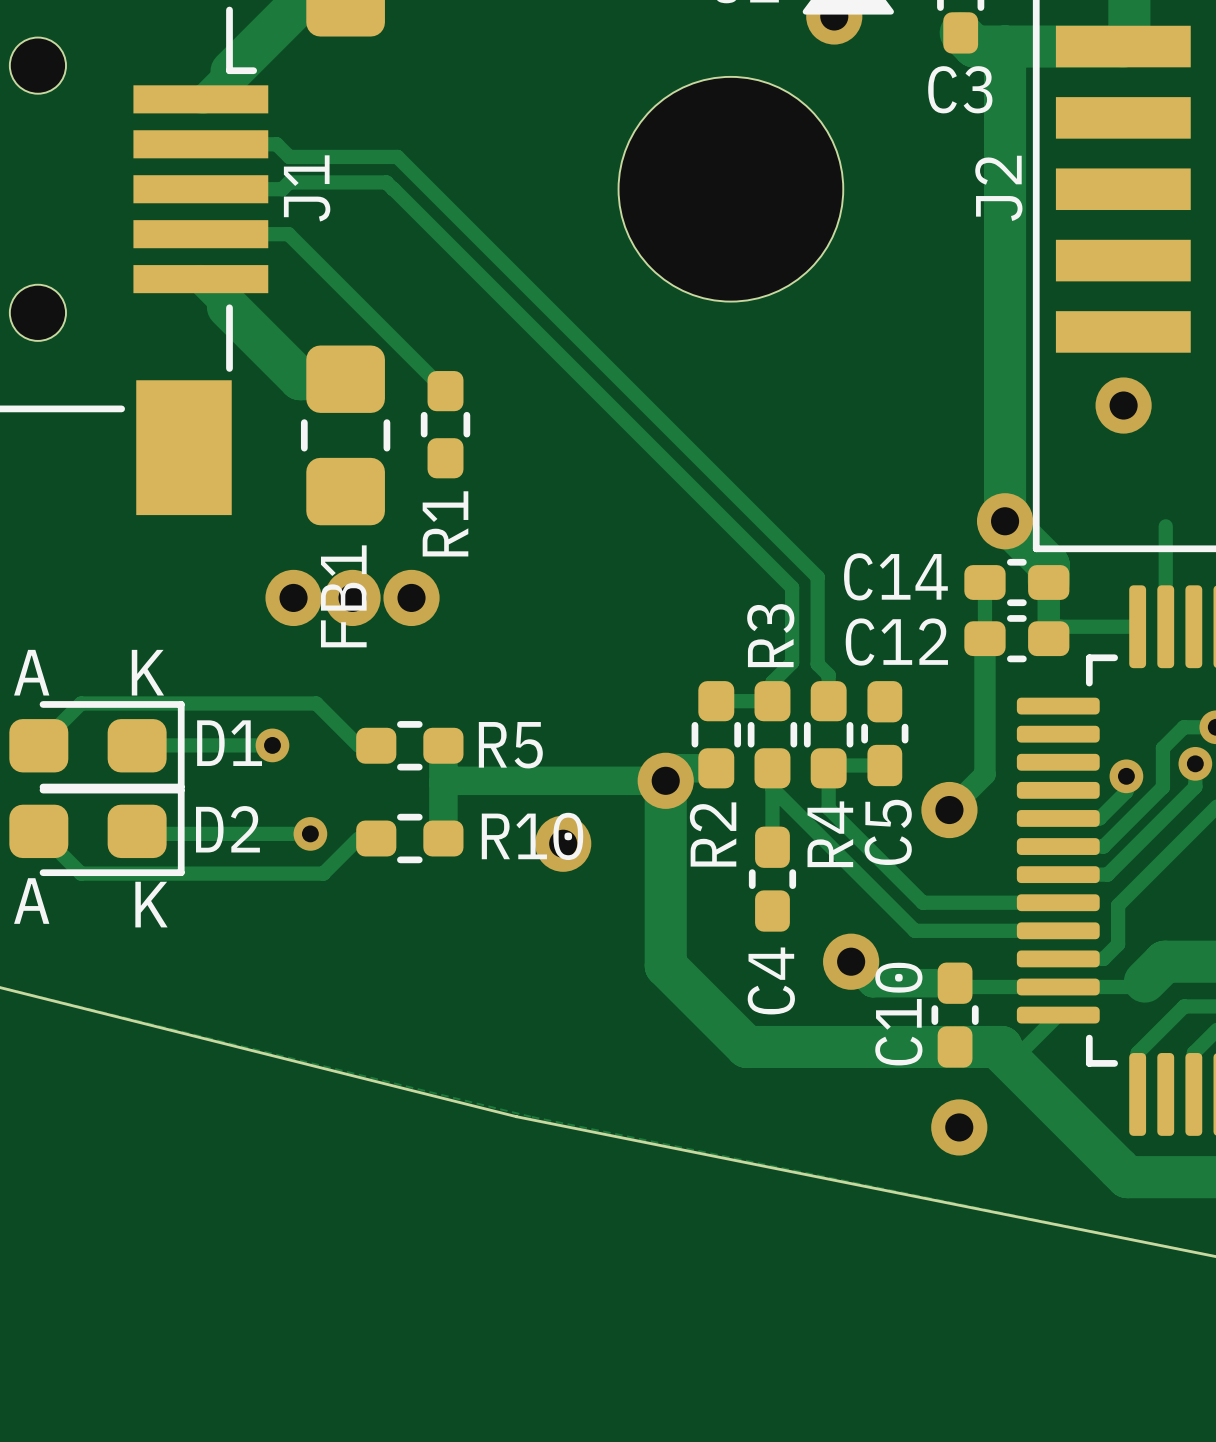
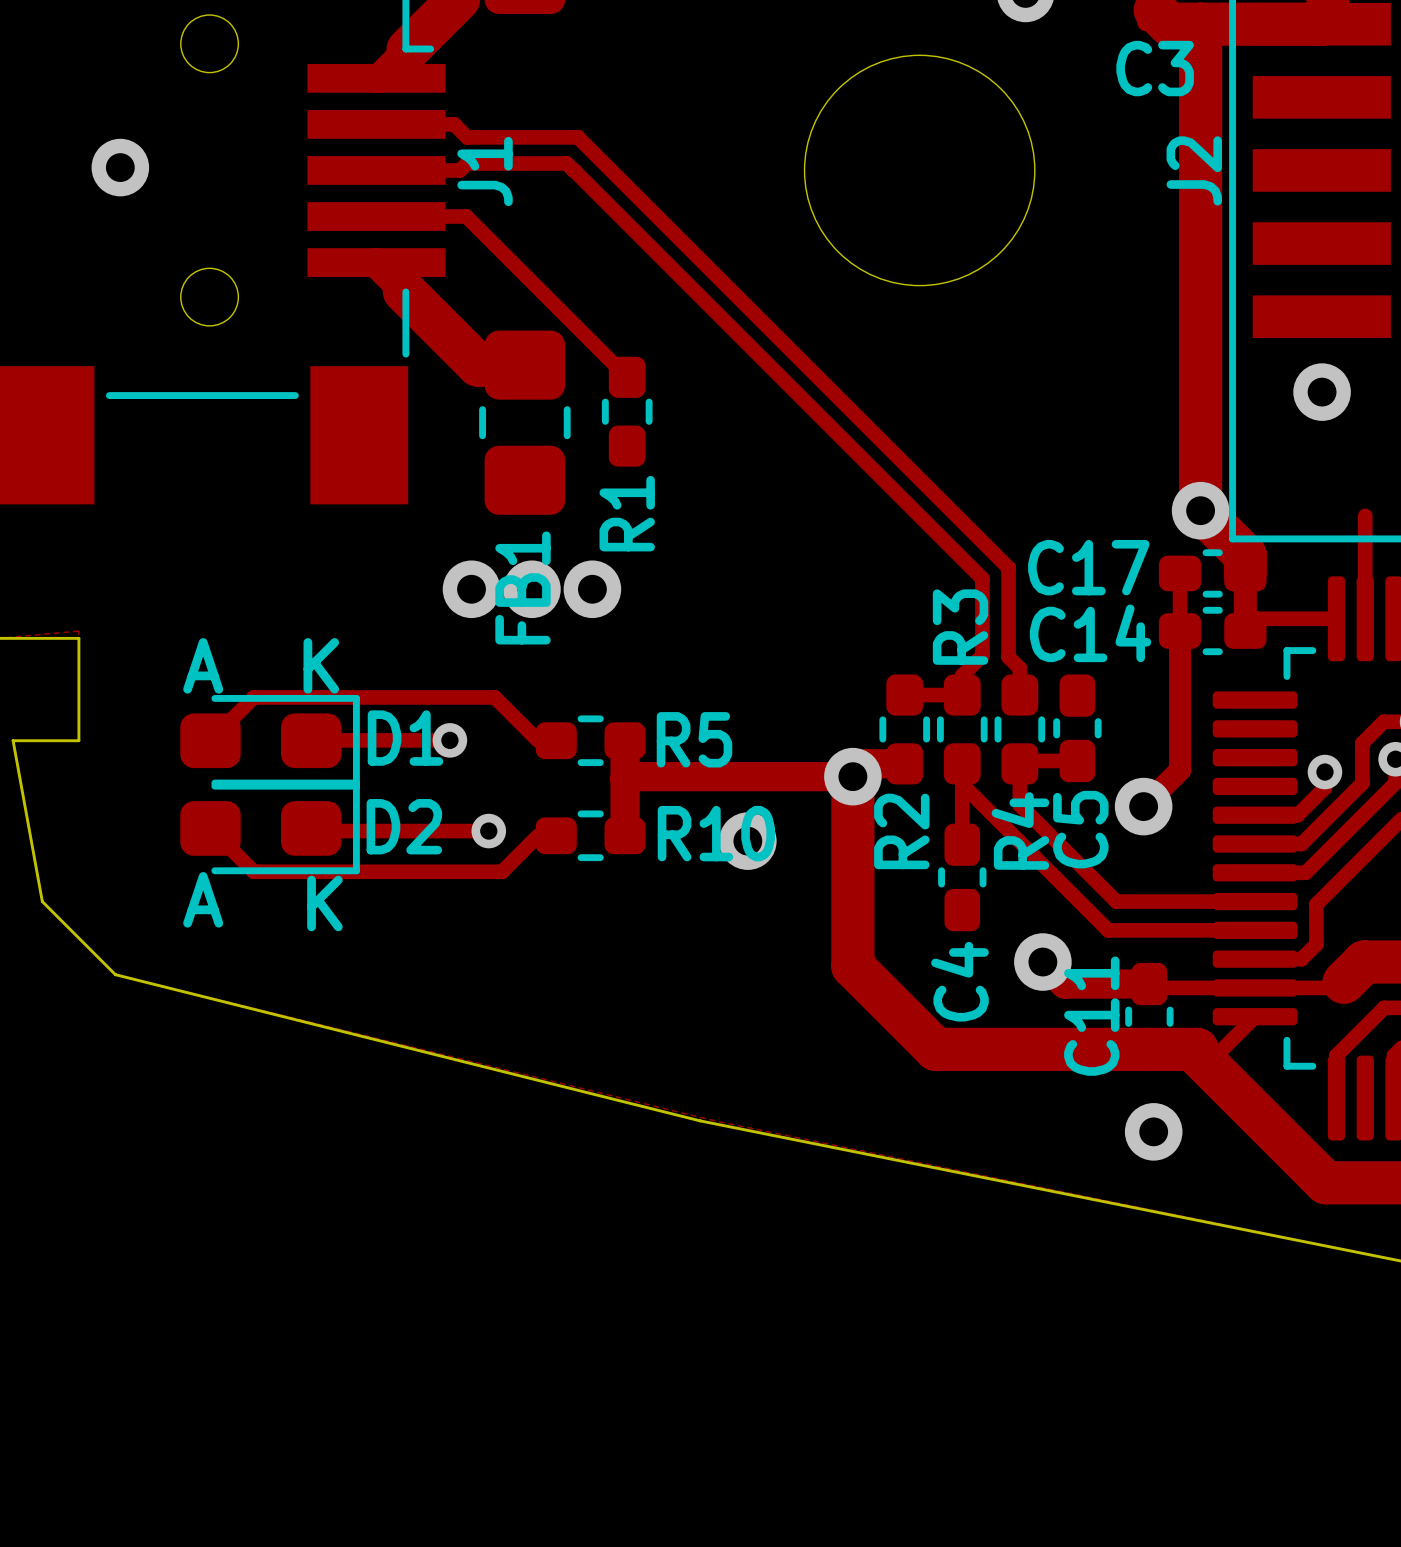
C14 name: C14 (895, 576) -> C17 (1088, 567)
C12 name: C12 (896, 642) -> C14 (1090, 633)
C10 name: C10 (898, 1014) -> C11 (1091, 1016)

